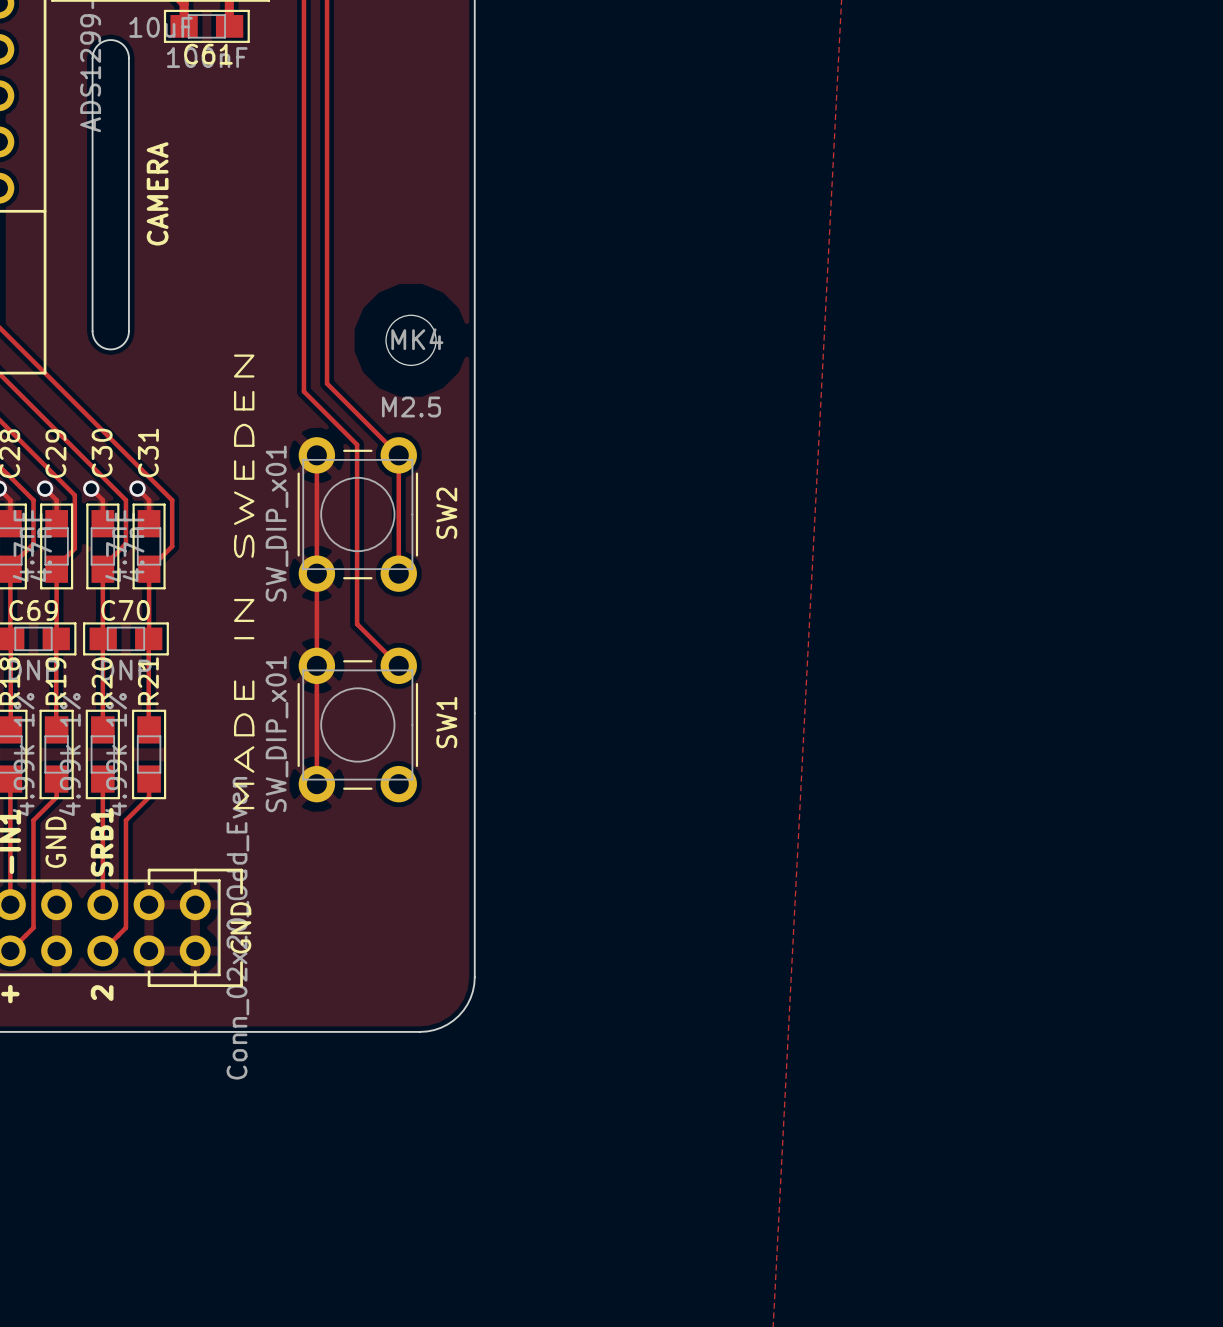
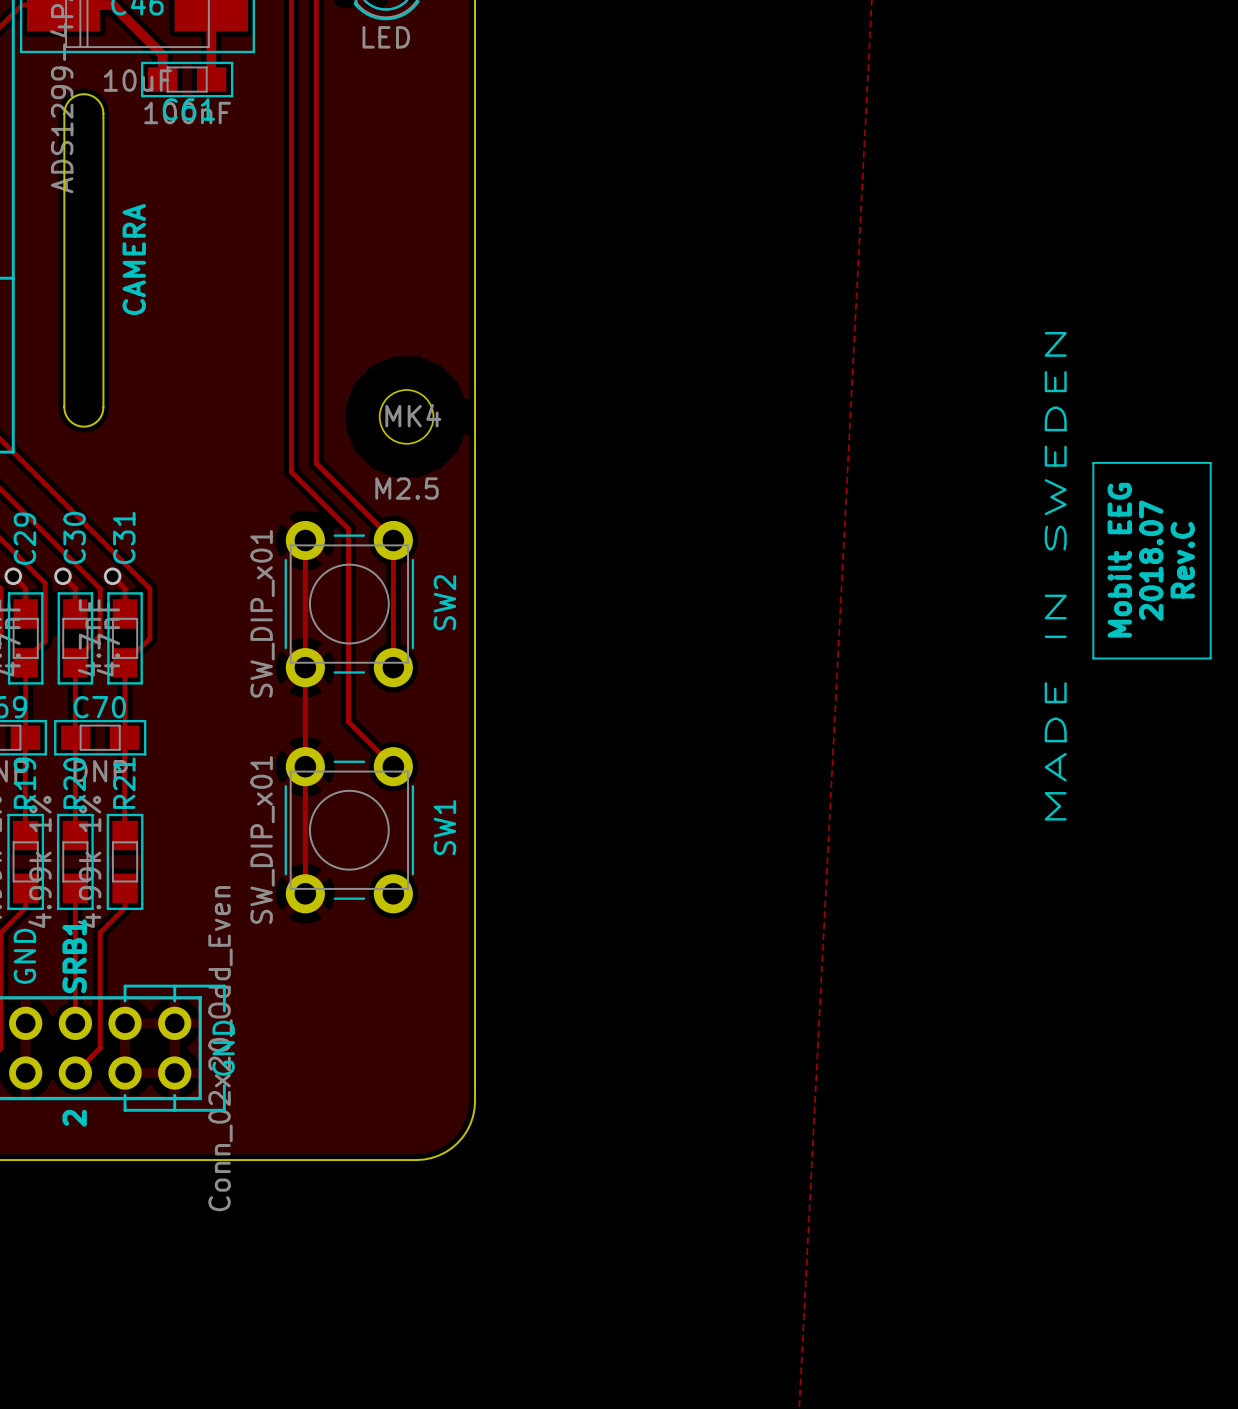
line: none -> (1093, 462) (1210, 462) (1210, 658) (1093, 658) (1093, 462)
text: none -> Mobilt EEG (1119, 560)
text: none -> Rev.C (1182, 560)
text: none -> 2018.07 (1151, 560)
text: none -> MADE IN SWEDEN (1055, 576)
text: MADE IN SWEDEN (244, 581) -> none

